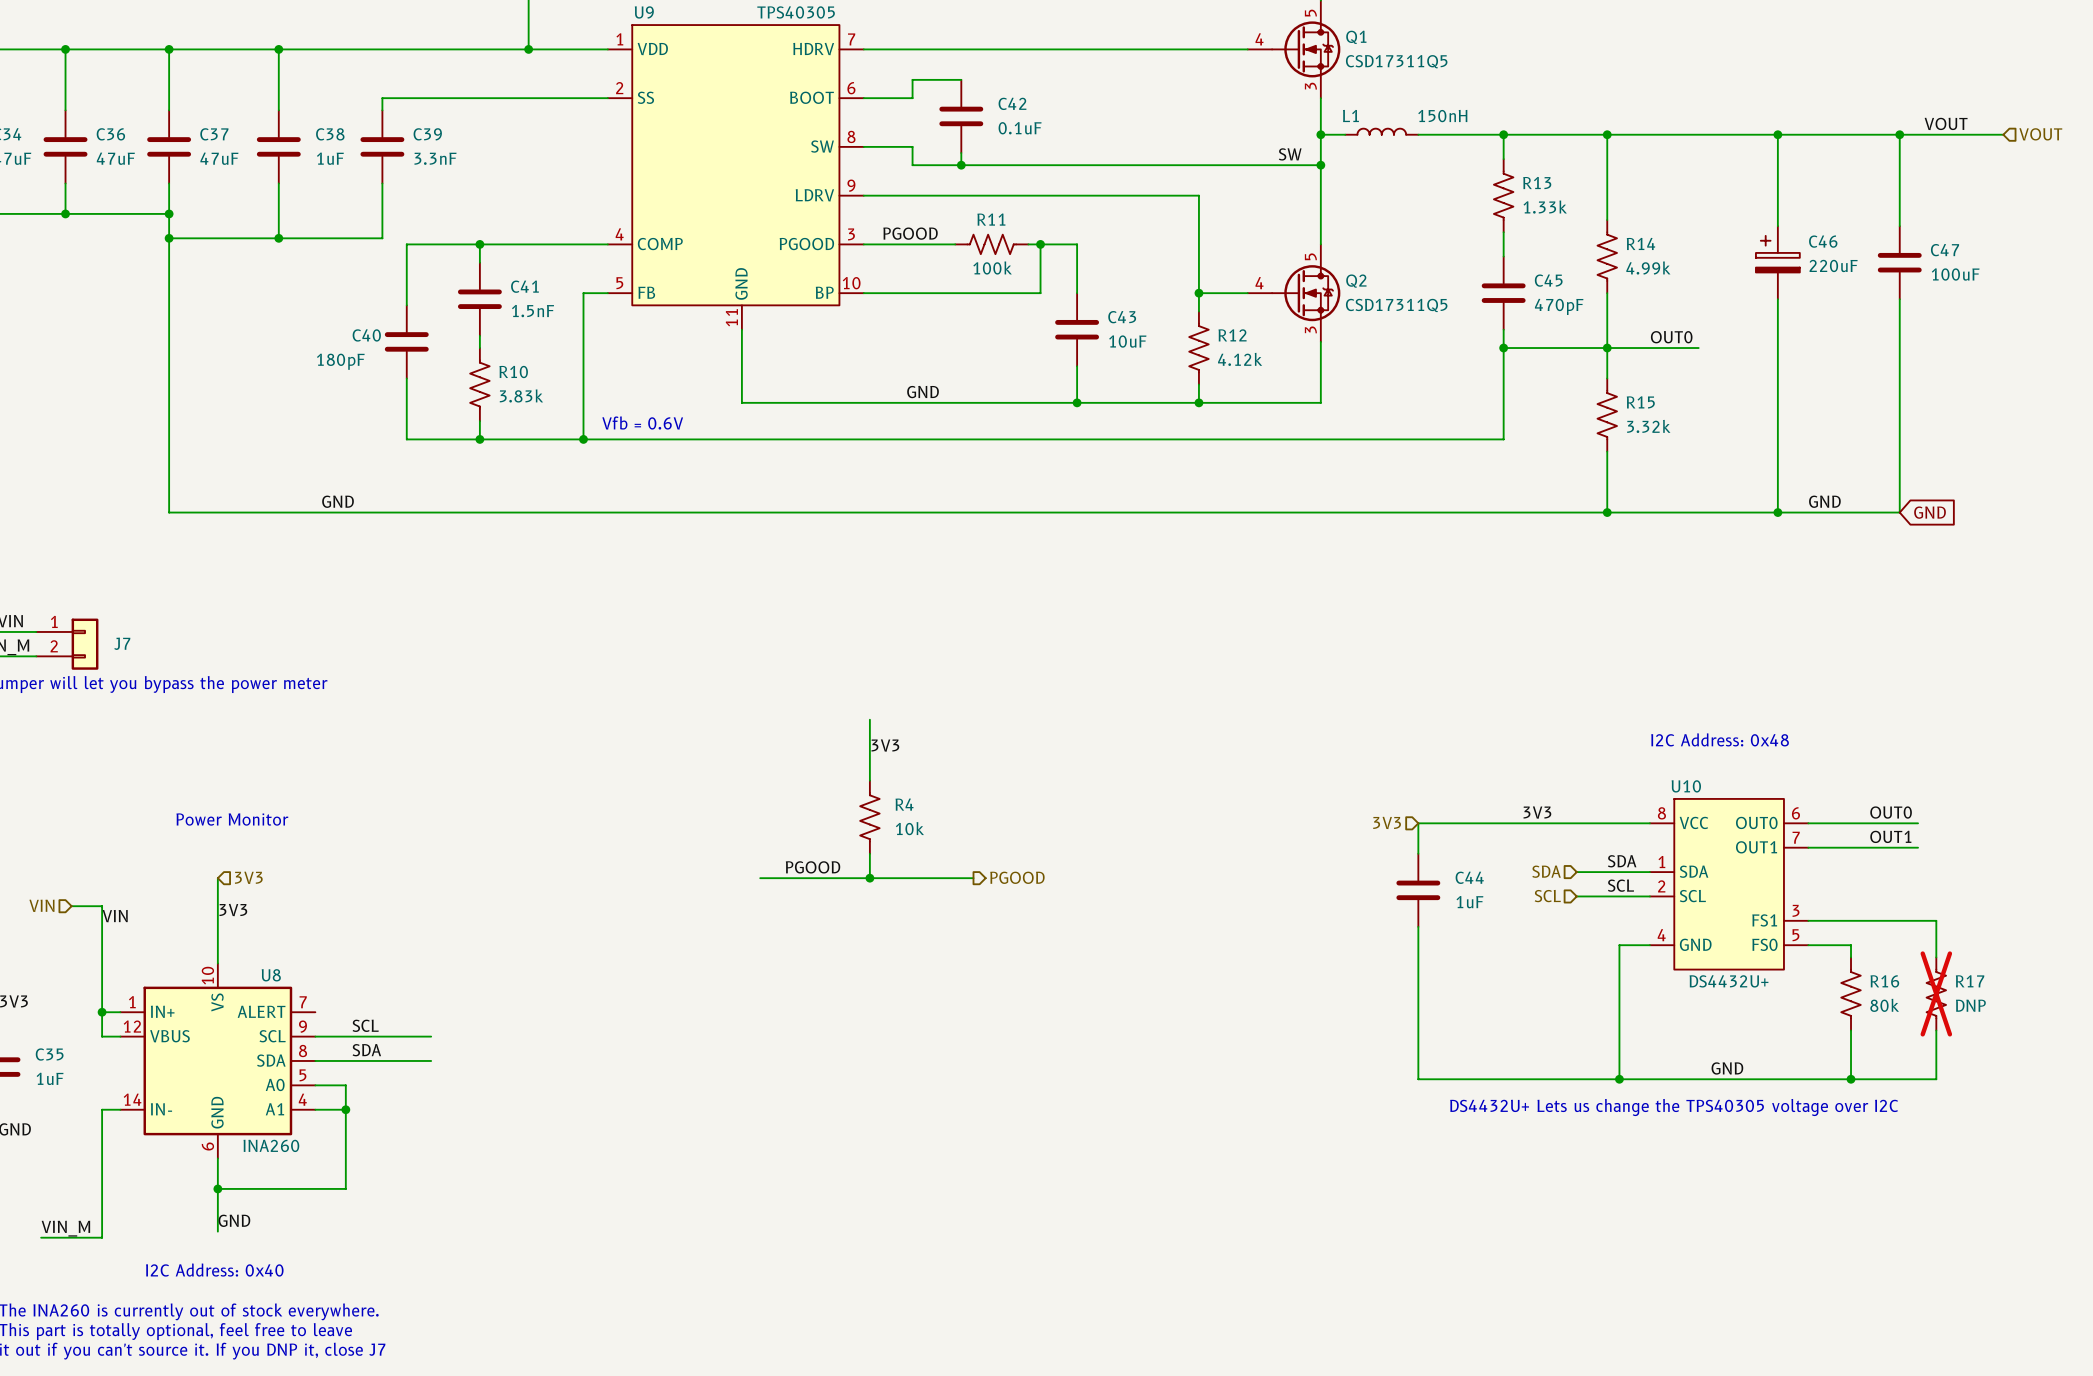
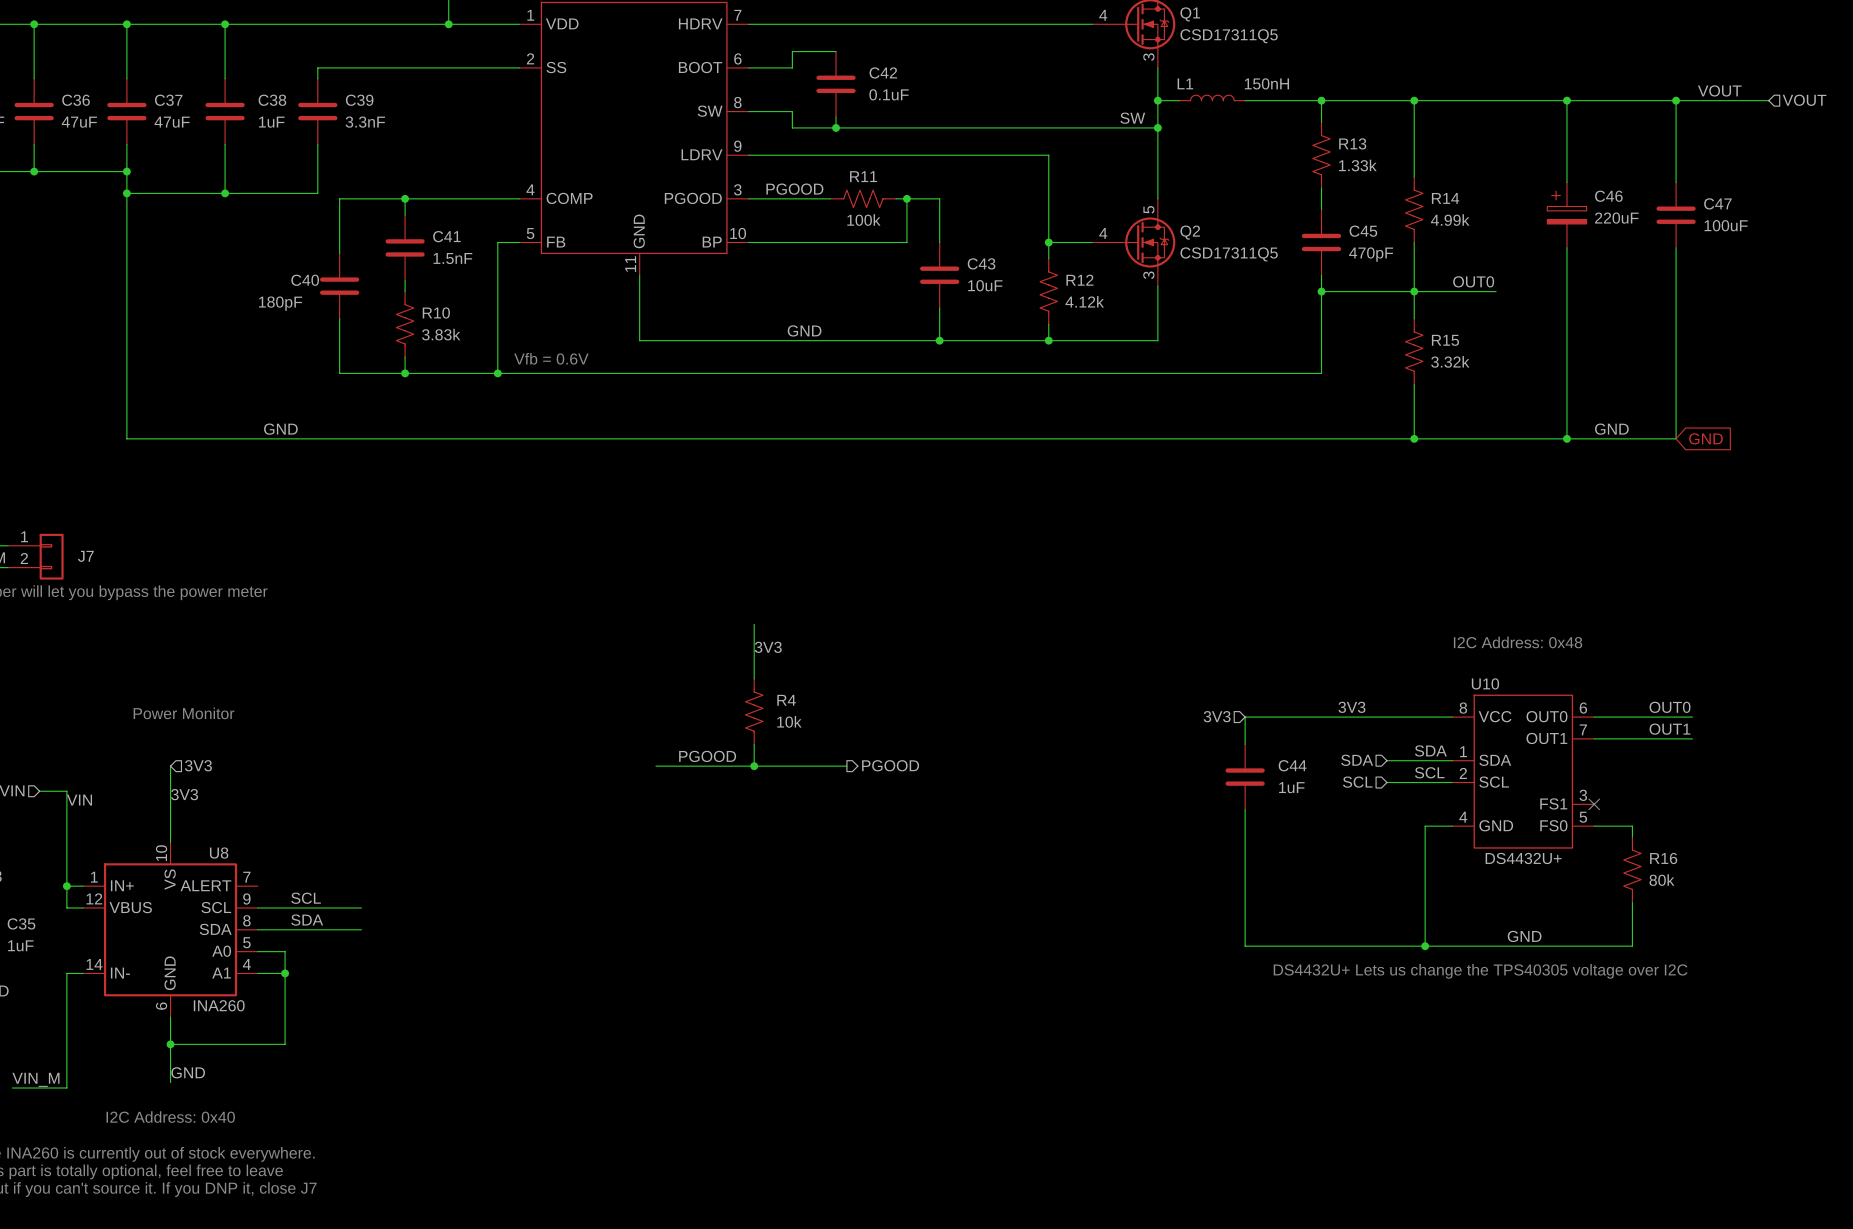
wire: (1808, 920) (1936, 920) (1936, 957) -> none
no-connect mark: none -> (1594, 804)
R17: DNP (1936, 993) -> none
wire: (1936, 1030) (1936, 1079) (1851, 1079) -> none
junction: (1851, 1079) -> none

